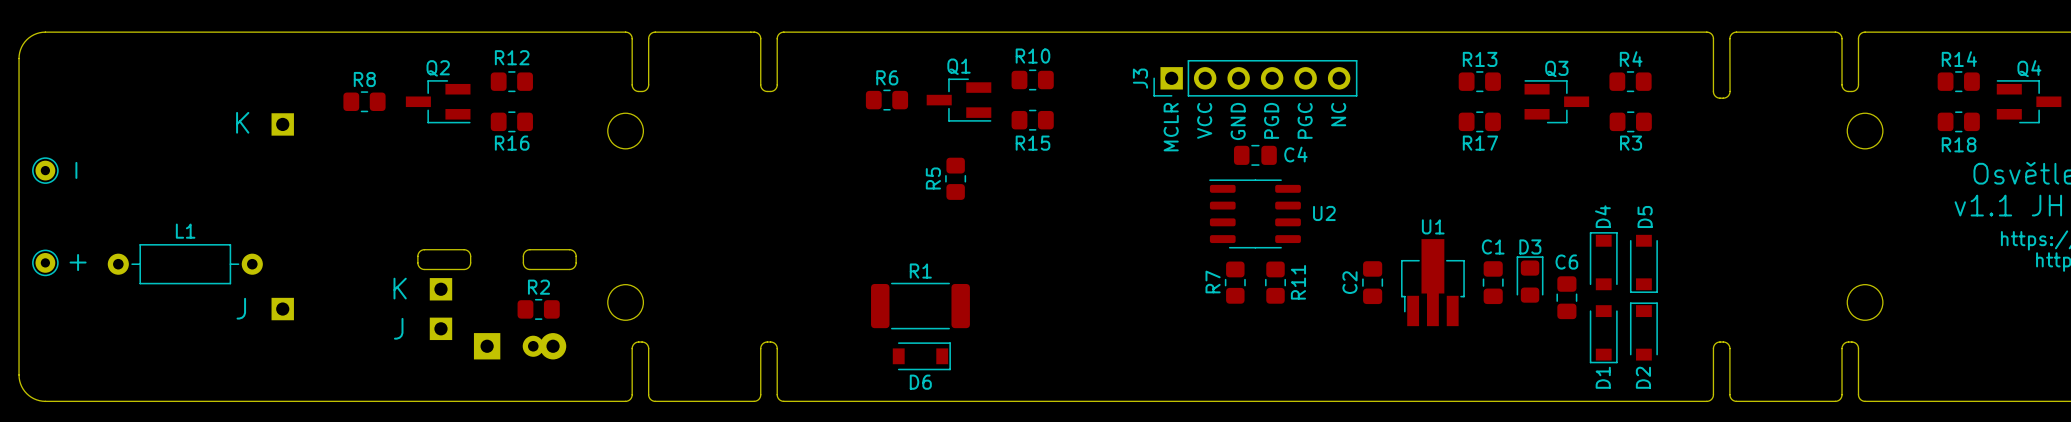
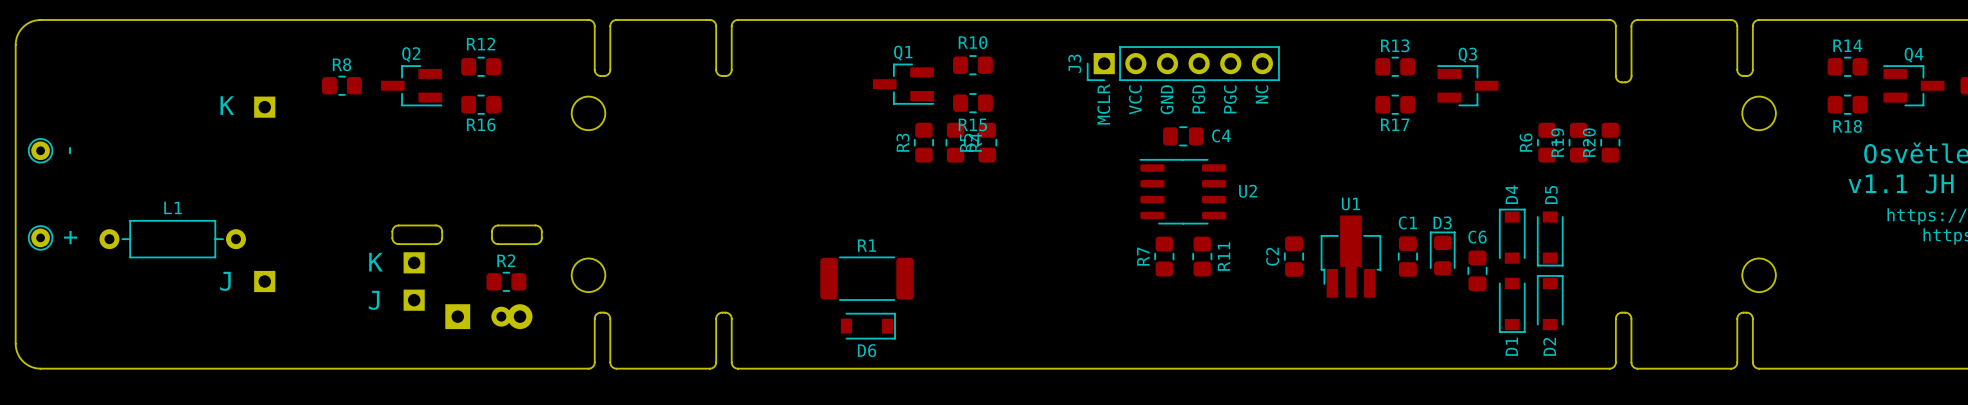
R6 name position: R6 (887, 77) -> R6 (1526, 142)
R4 rotation: 0° (1630, 81) -> 90° clockwise (955, 142)
R4 position: (1630, 81) -> (955, 142)
R6 rotation: 0° (886, 100) -> 90° clockwise (1547, 142)
R6 position: (886, 100) -> (1547, 142)
R3 rotation: 0° (1630, 121) -> 90° clockwise (923, 142)
R3 position: (1630, 121) -> (923, 142)
R19: none -> (1578, 142)
R20: none -> (1610, 142)
R5 position: (955, 178) -> (987, 142)

